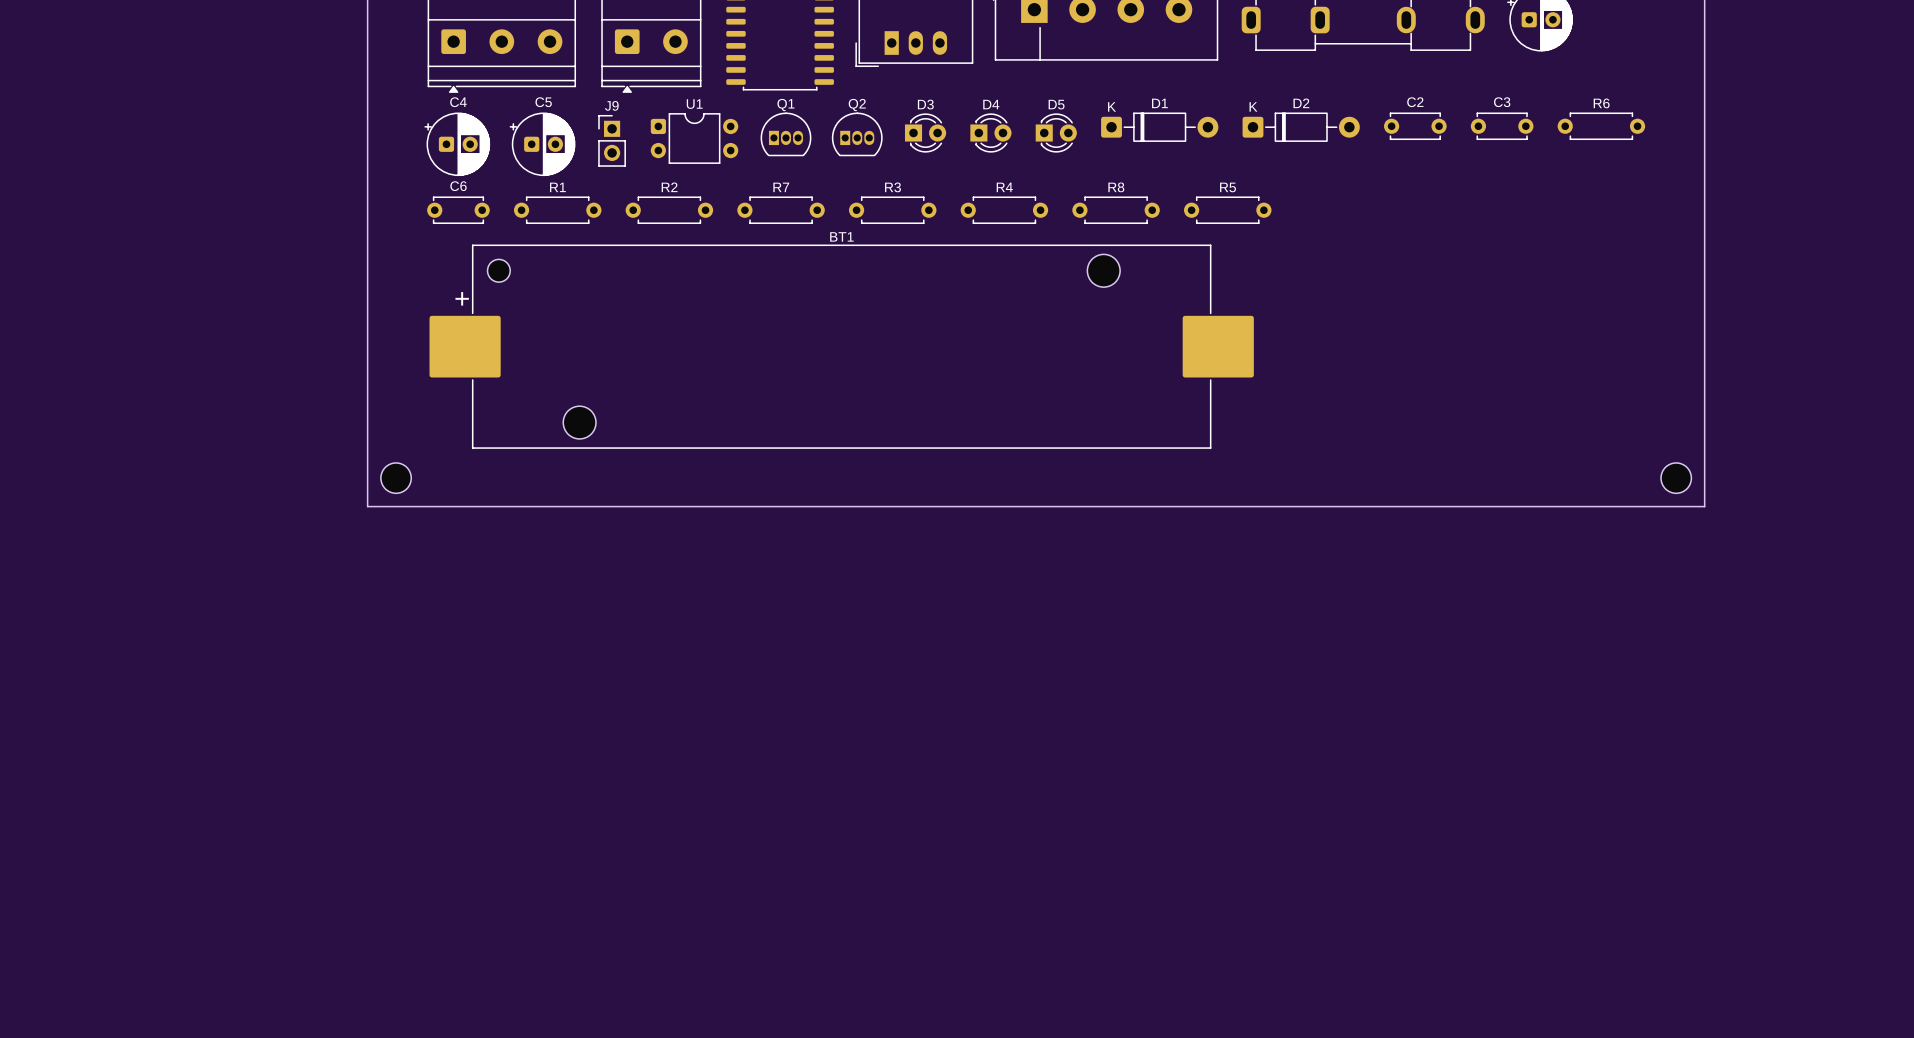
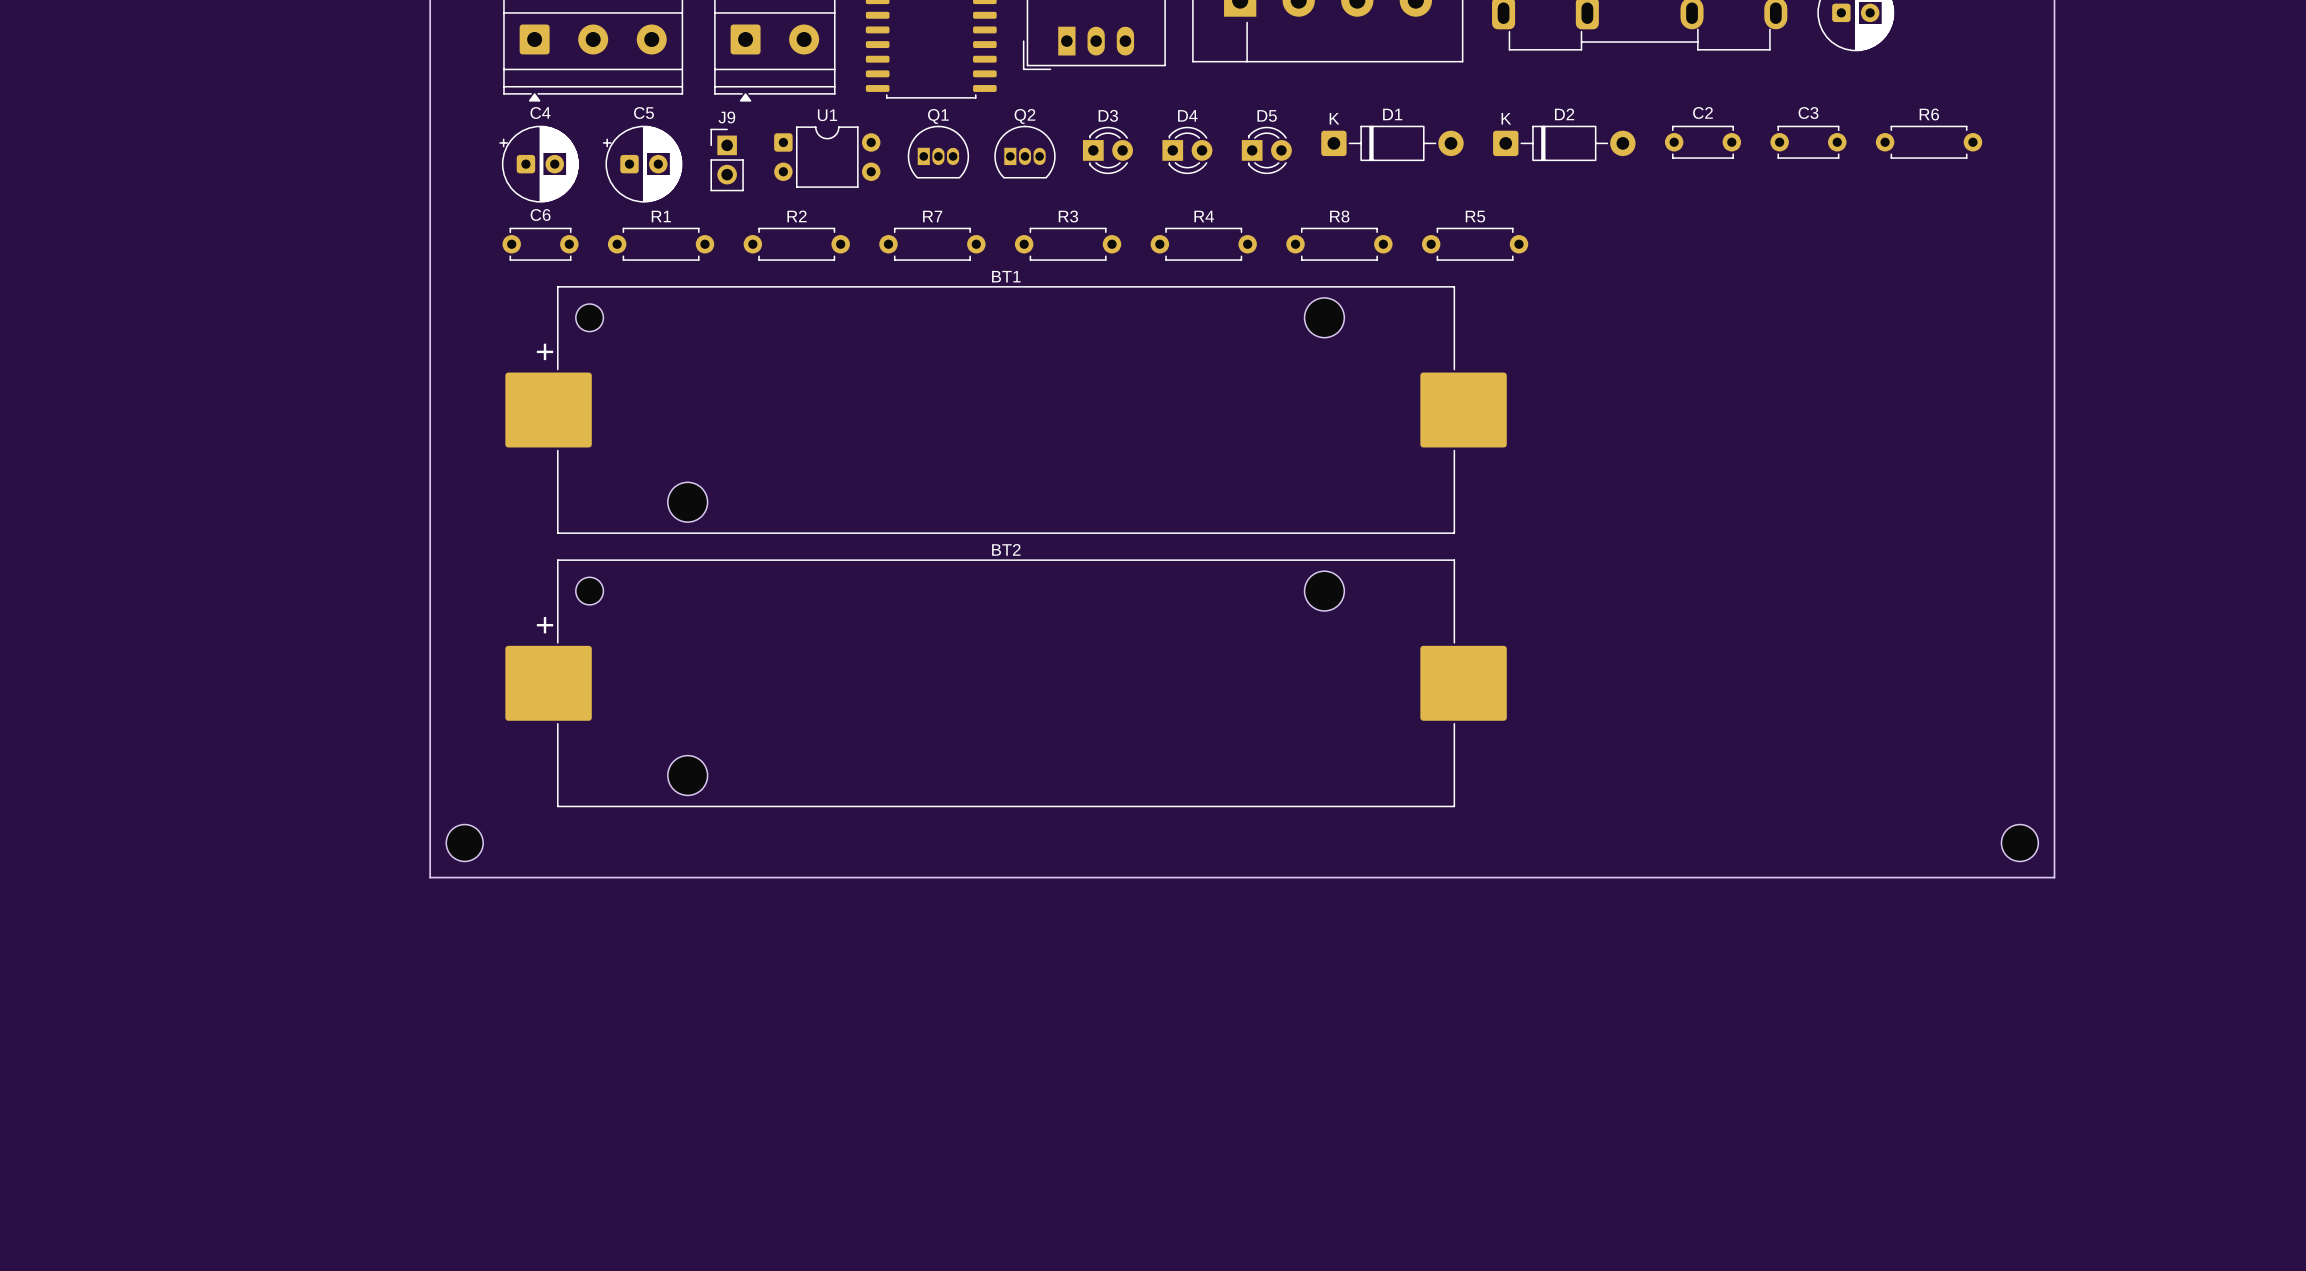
part position: (396, 478) -> (464, 843)
part position: (1676, 478) -> (2019, 843)
board edge: (367, 506) (1704, 506) -> (430, 604) (430, 877) (2054, 877) (2054, 604)
BT2: none -> (1006, 683)

